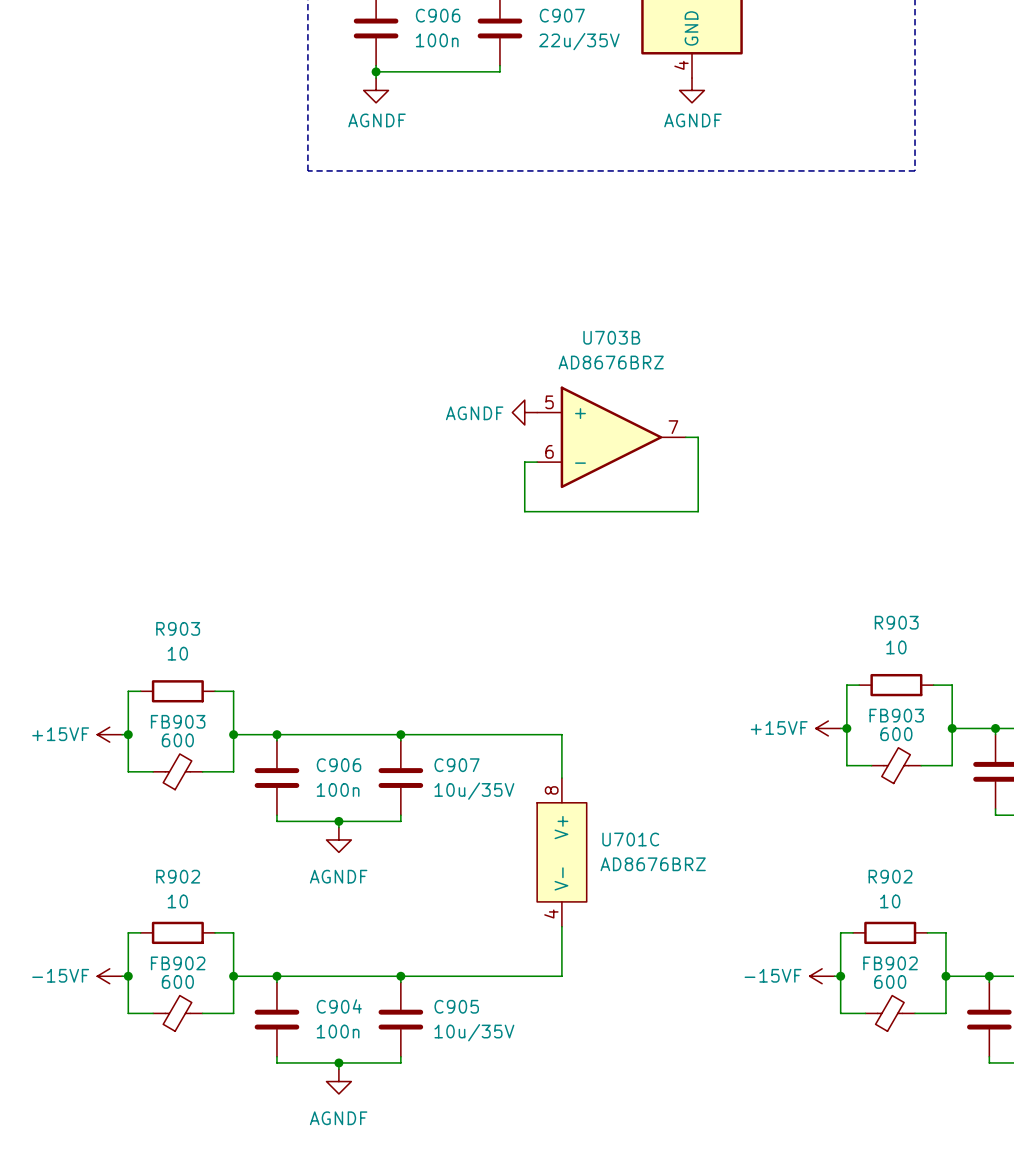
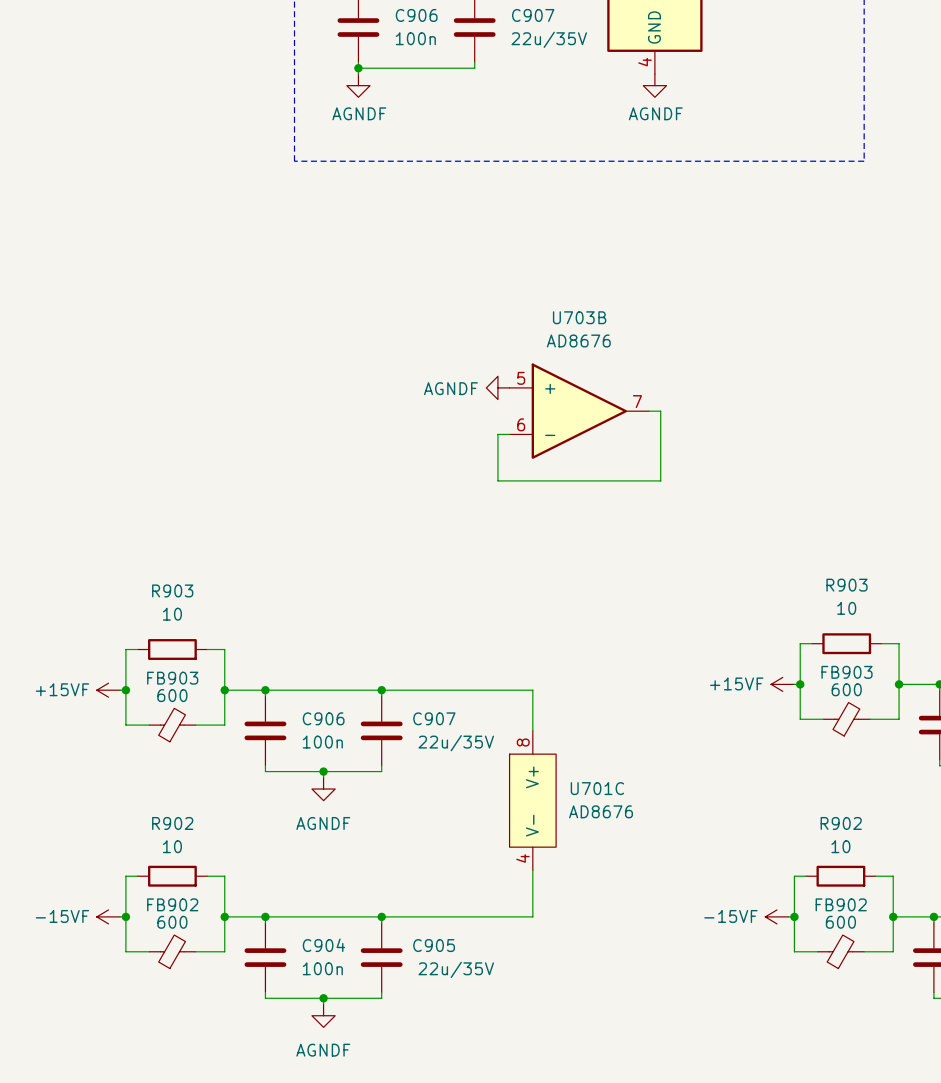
U703B value: AD8676BRZ (611, 362) -> AD8676 (578, 340)
C907 value: 10u/35V (474, 791) -> 22u/35V (456, 743)
U701C value: AD8676BRZ (653, 864) -> AD8676 (601, 811)
C905 value: 10u/35V (474, 1032) -> 22u/35V (456, 969)

